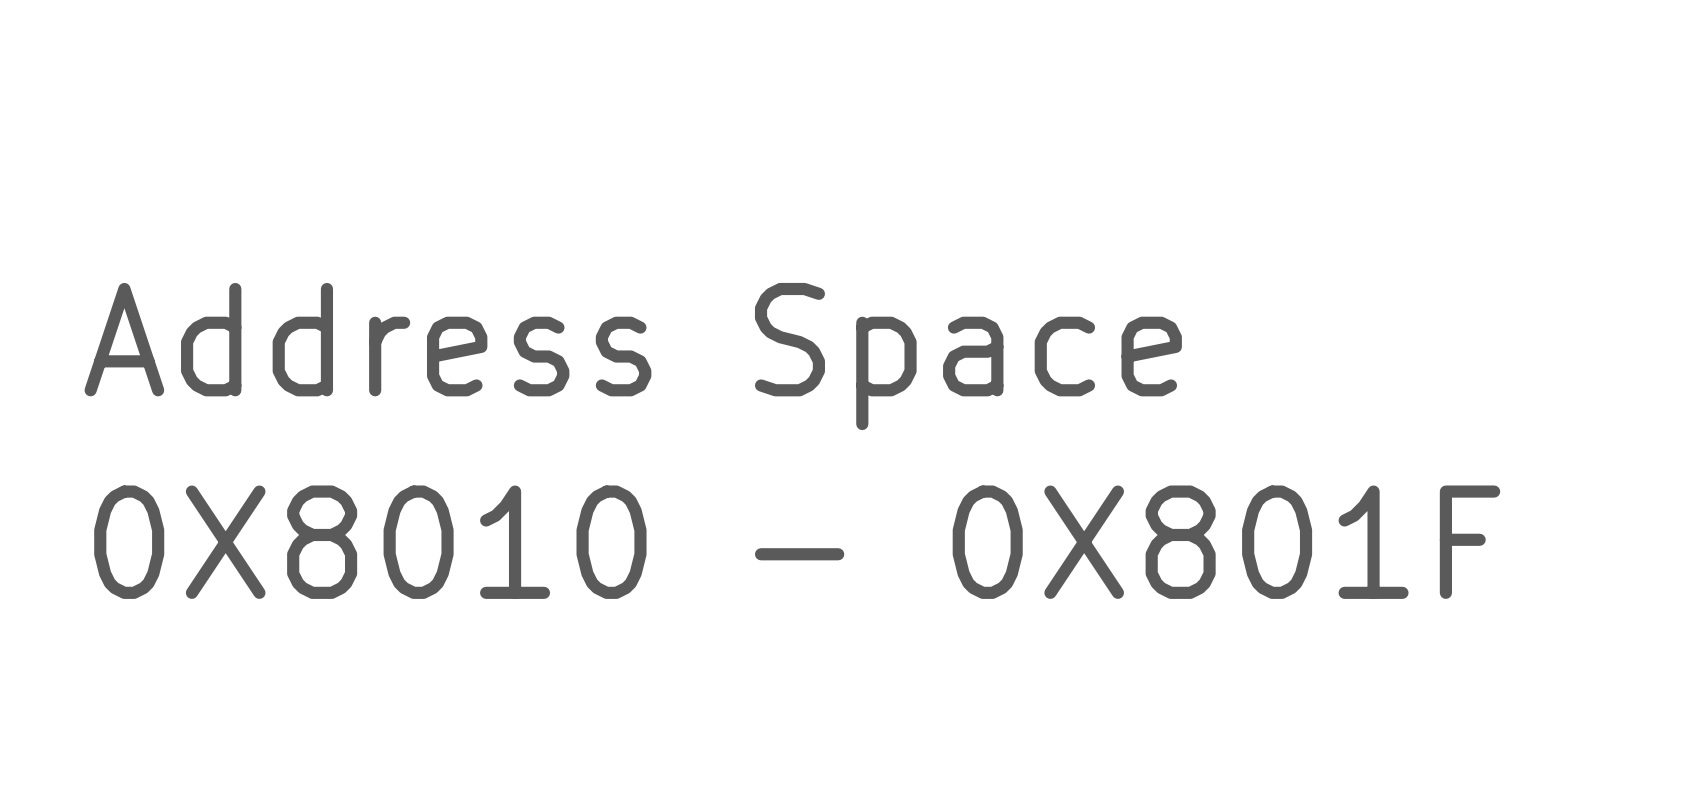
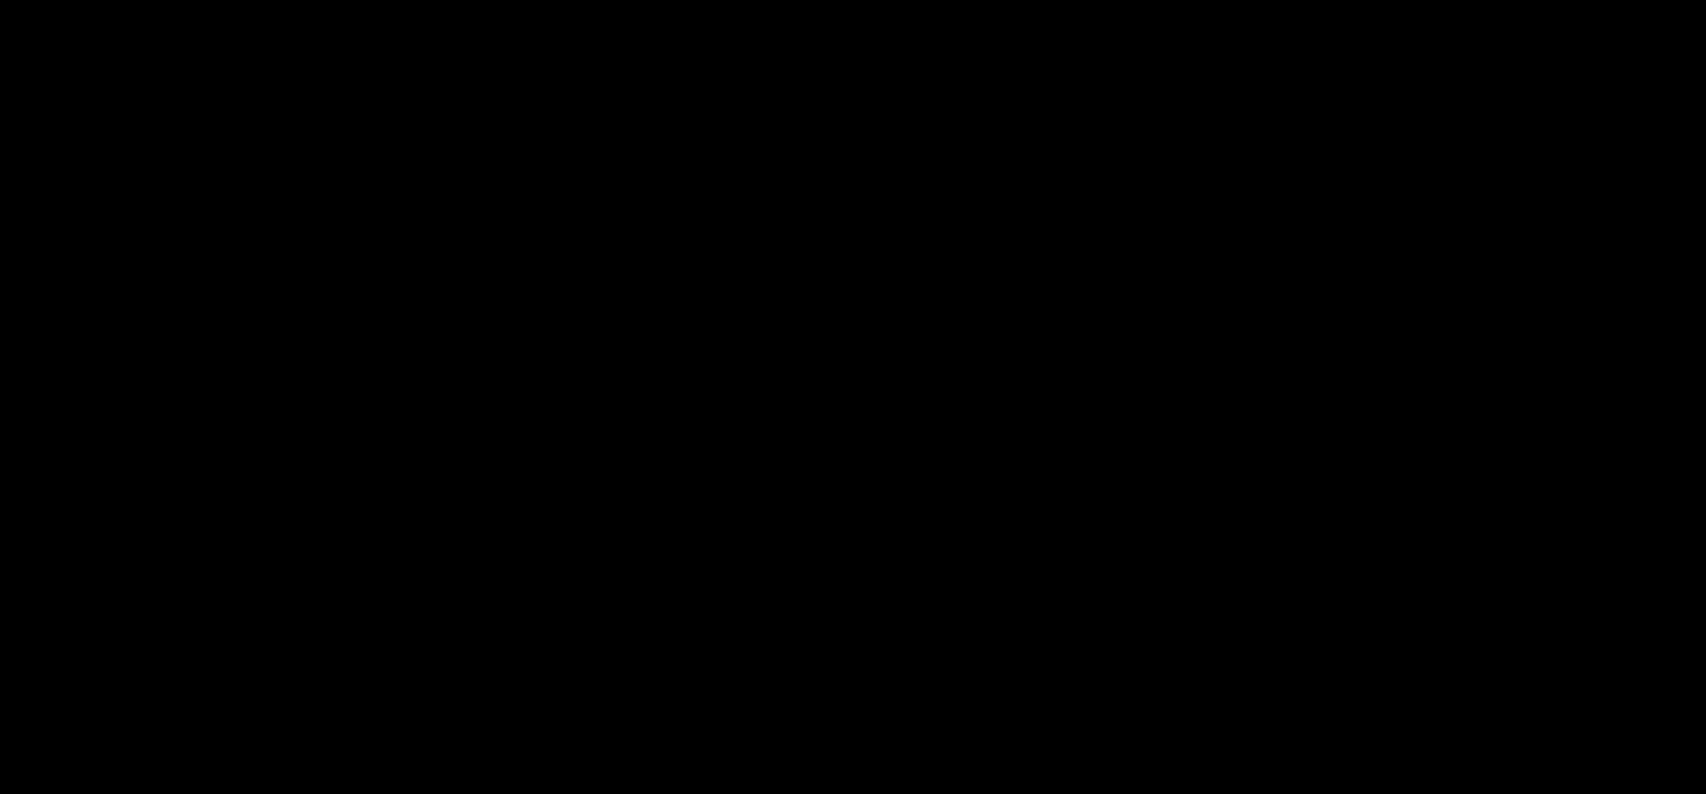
text: Address Space (633, 356) -> none
text: 0X8010 - 0X801F (797, 542) -> none

